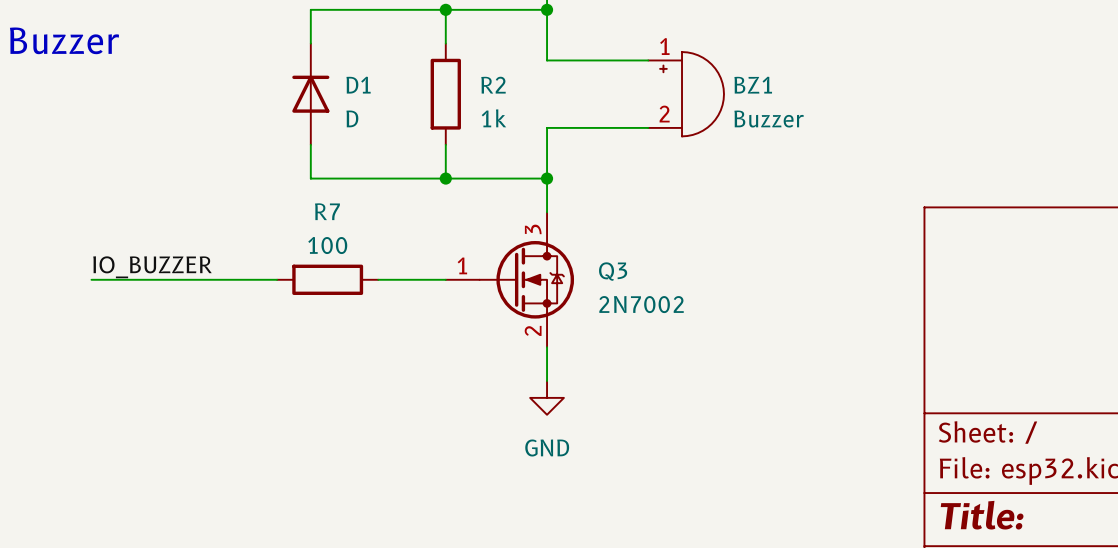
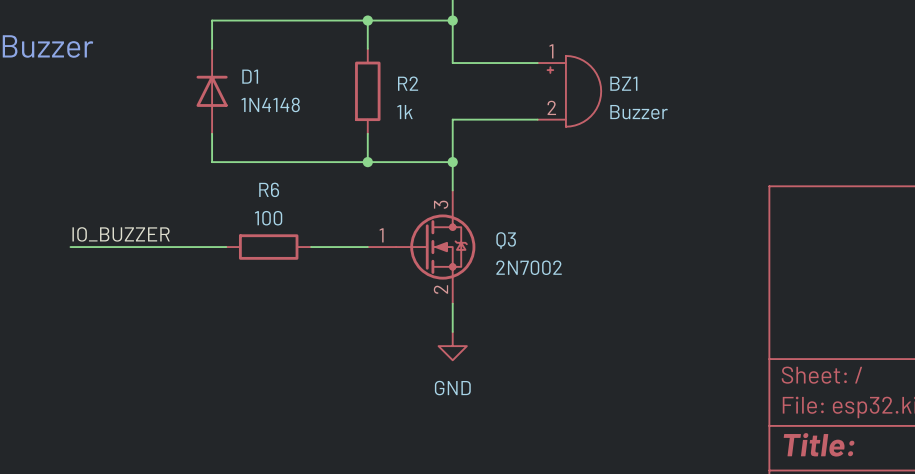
wire: (310, 9) (310, 43) -> (254, 20) (212, 20) (212, 48)
D1 name position: D1 (358, 85) -> D1 (250, 76)
D1 position: (310, 94) -> (212, 91)
D1 value: D (352, 118) -> 1N4148 (270, 104)
wire: (310, 144) (310, 178) -> (212, 133) (212, 162) (254, 162)
R7 name: R7 (327, 211) -> R6 (269, 189)

